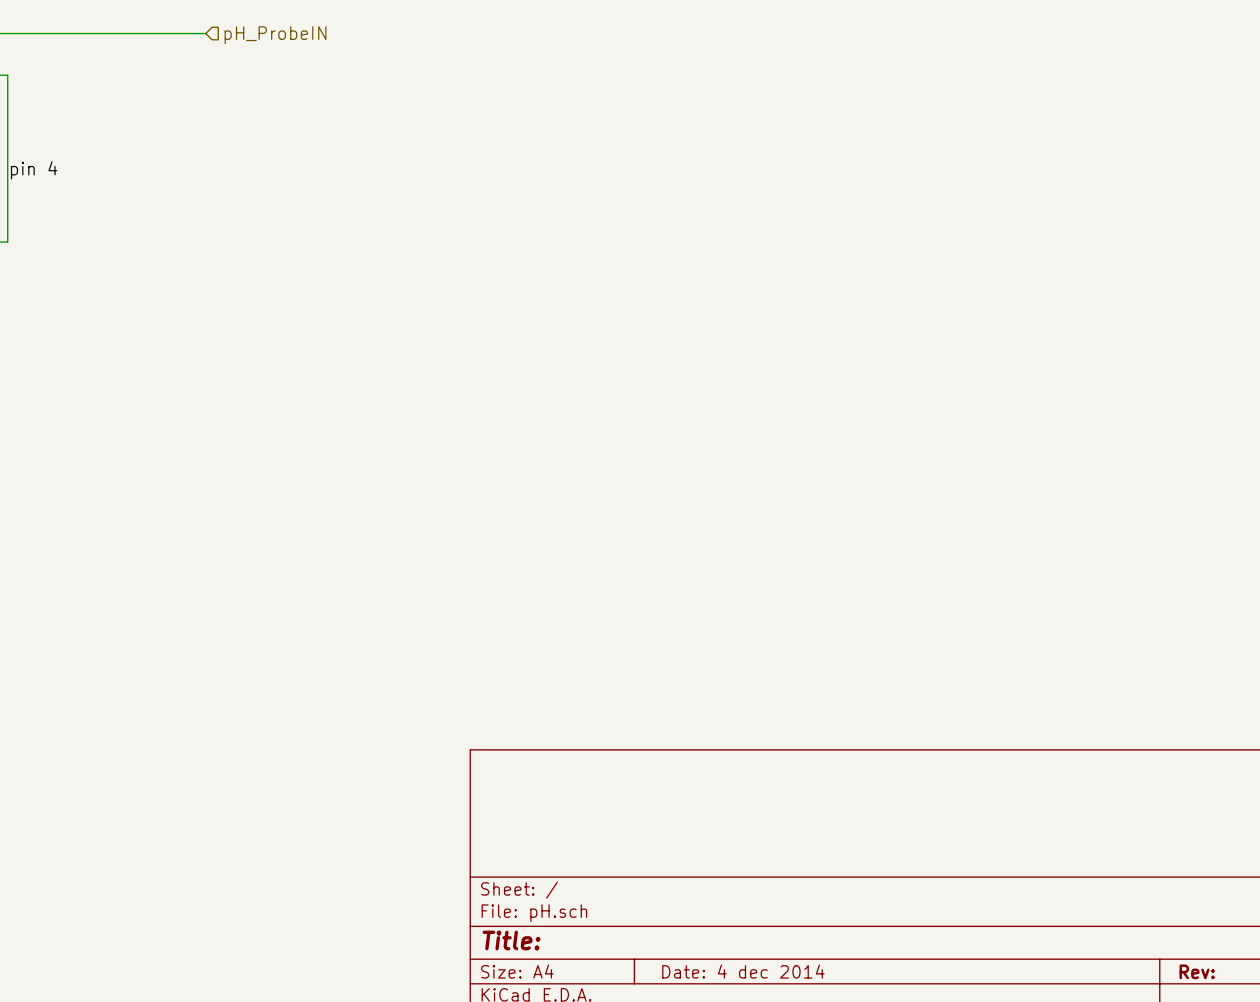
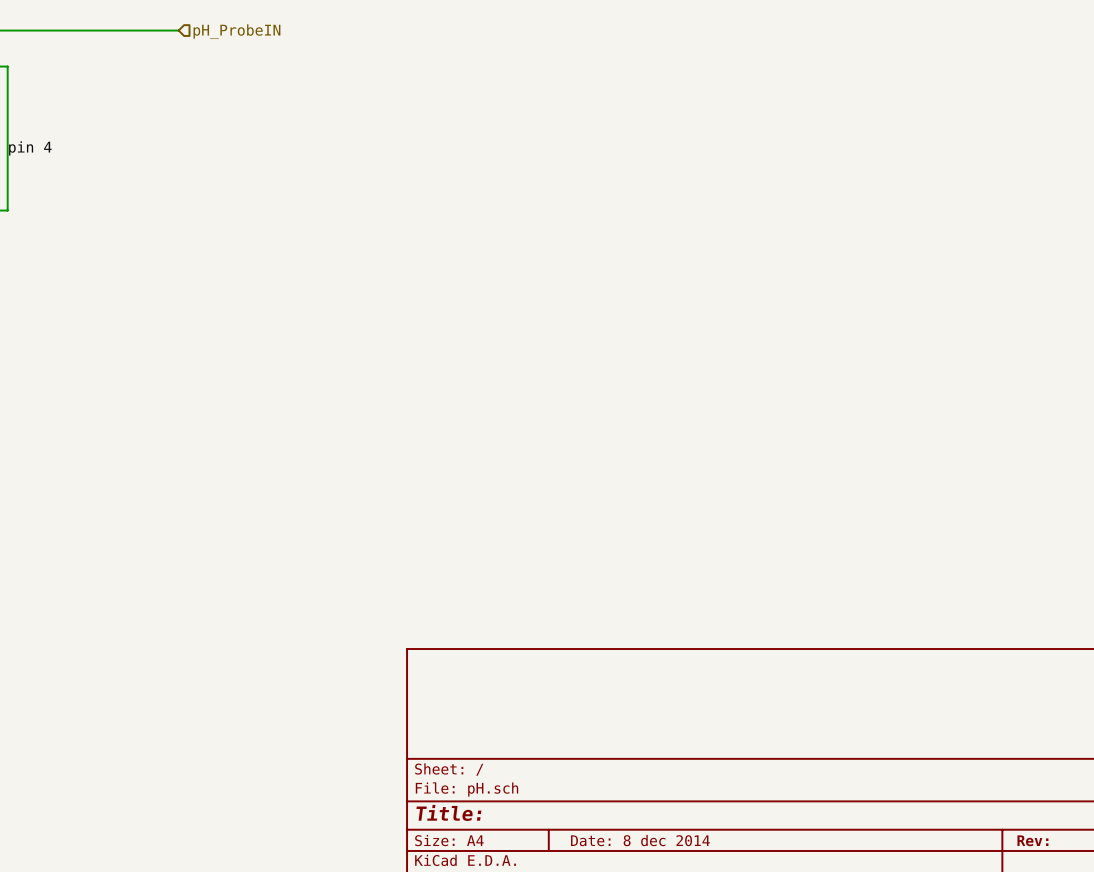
title block: Date: 4 dec 2014 (743, 971) -> Date: 8 dec 2014 (640, 840)

